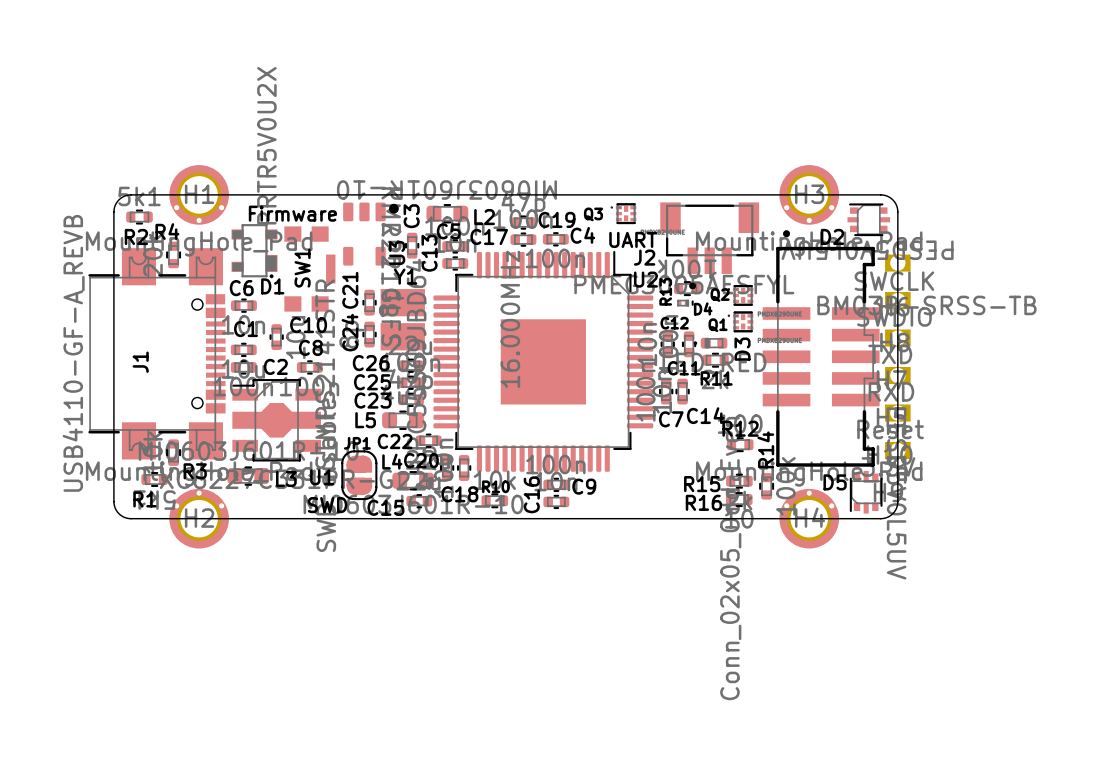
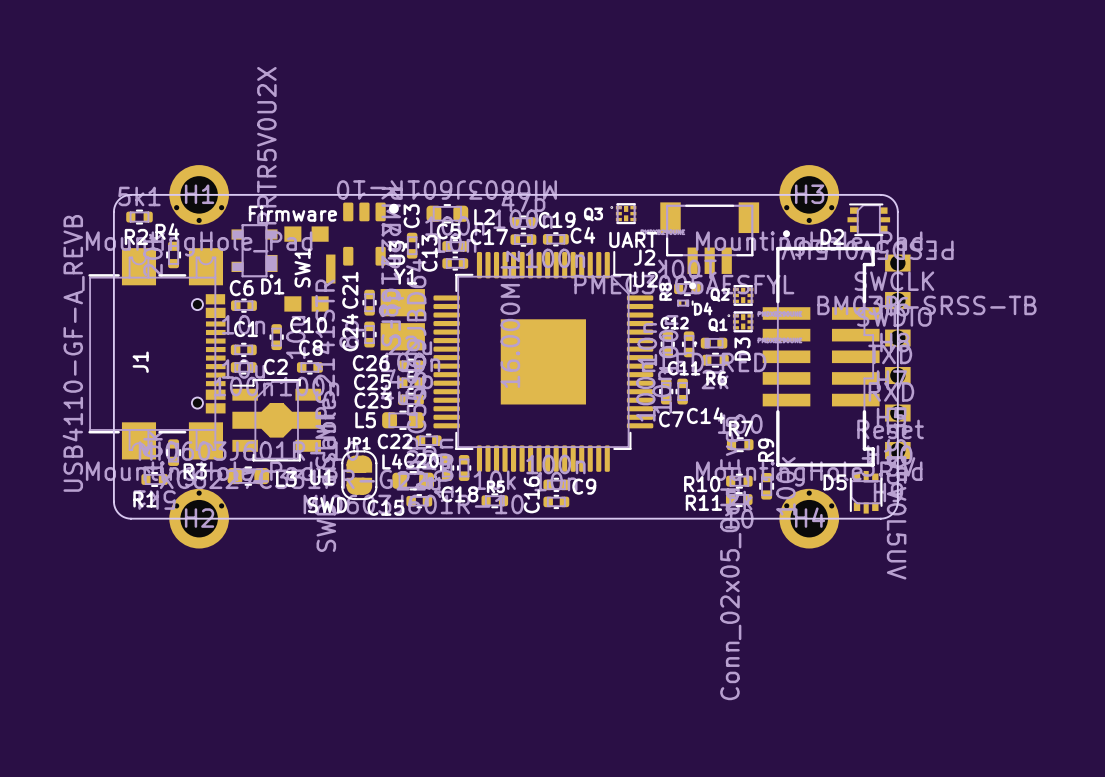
R13 name: R13 (665, 291) -> R8 (665, 291)
R11 name: R11 (716, 378) -> R6 (716, 378)
R12 name: R12 (740, 428) -> R7 (740, 428)
R14 name: R14 (765, 449) -> R9 (766, 450)
R15 name: R15 (702, 484) -> R10 (702, 484)
R10 name: R10 (495, 486) -> R5 (495, 486)
R16 name: R16 (703, 502) -> R11 (703, 502)

